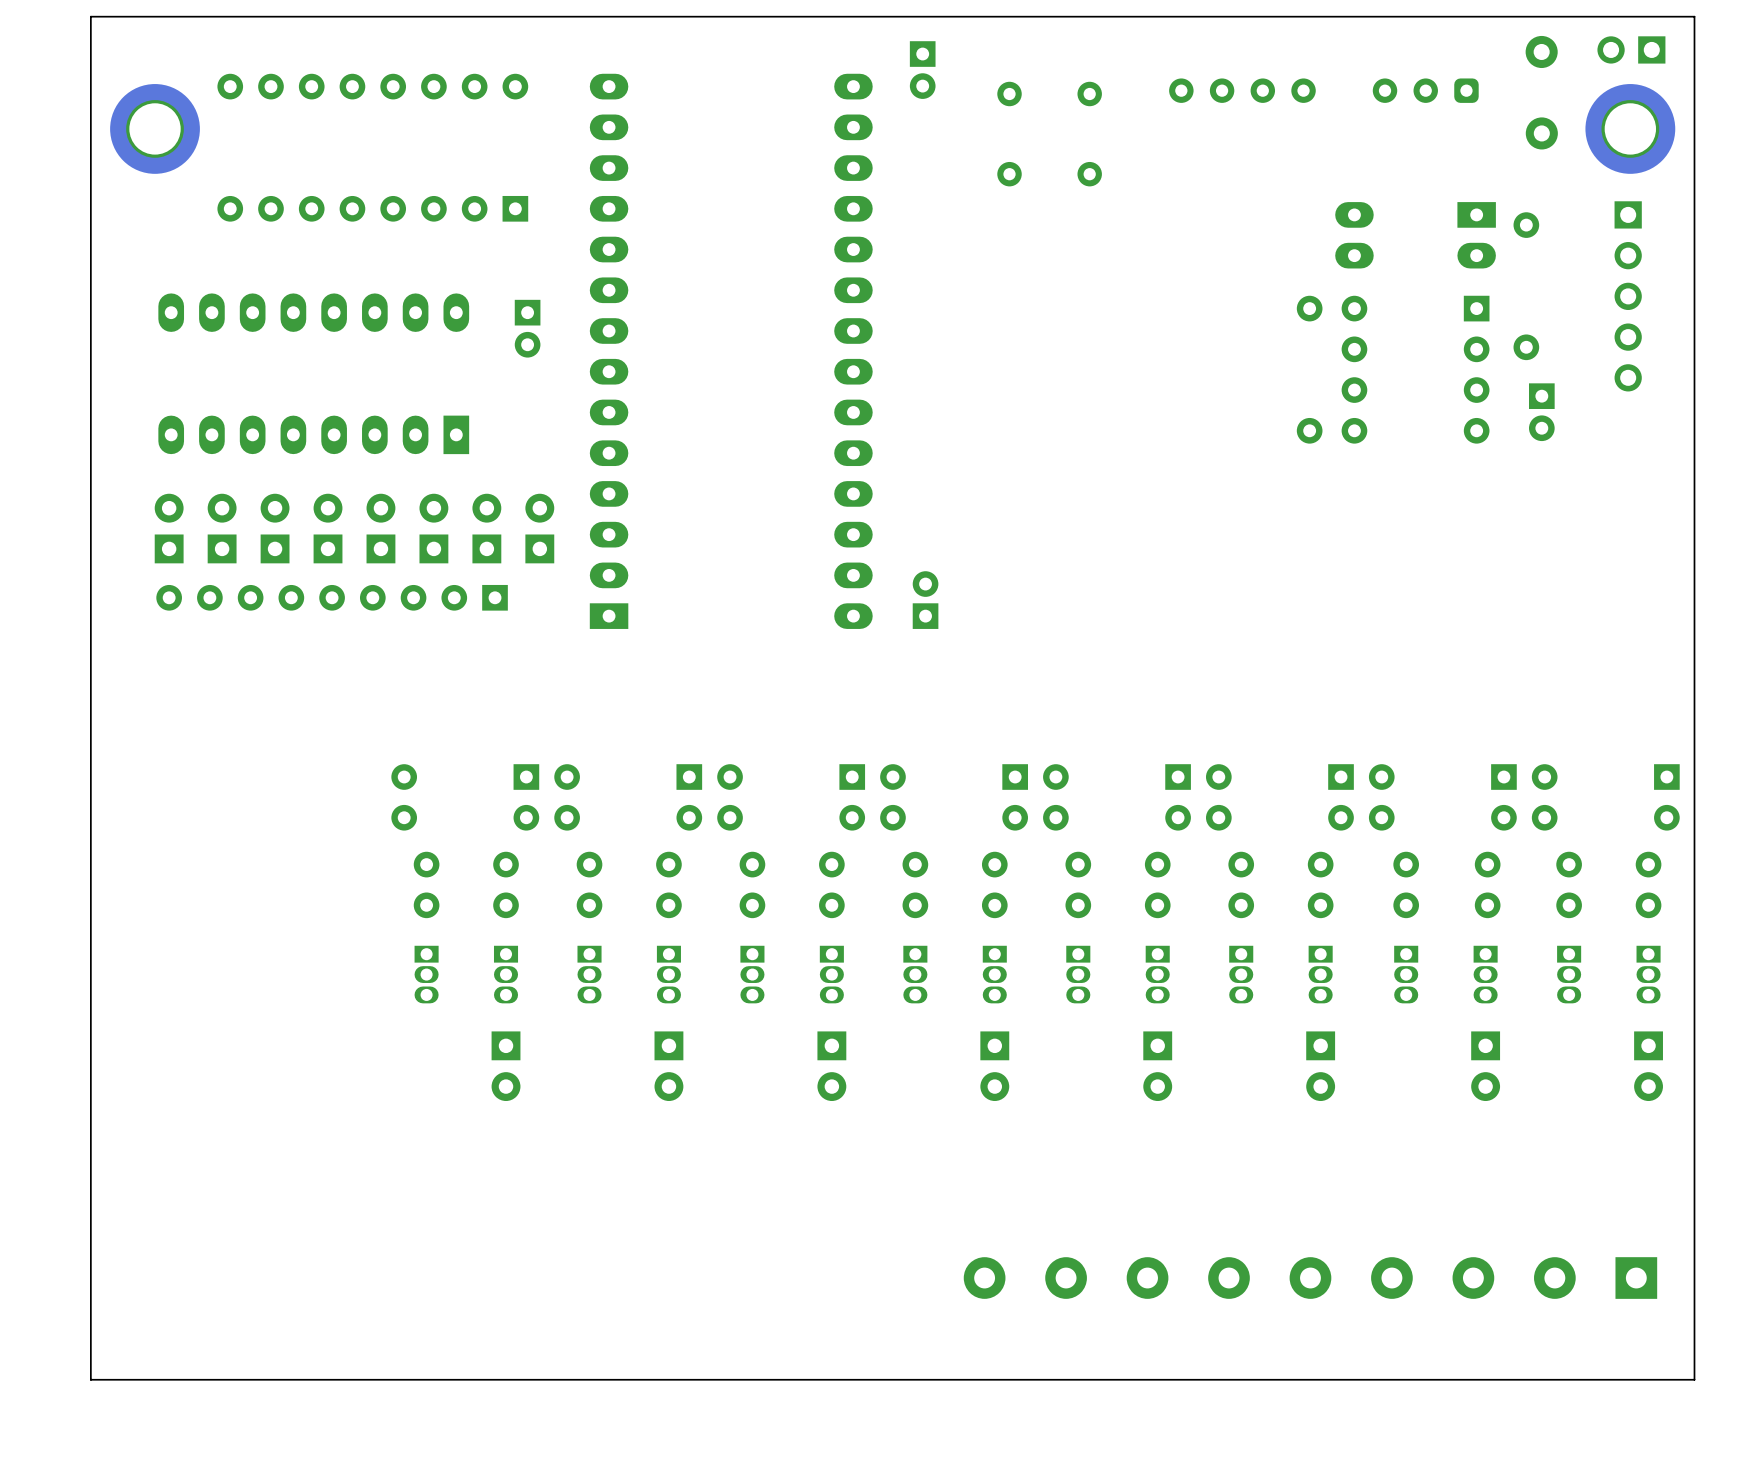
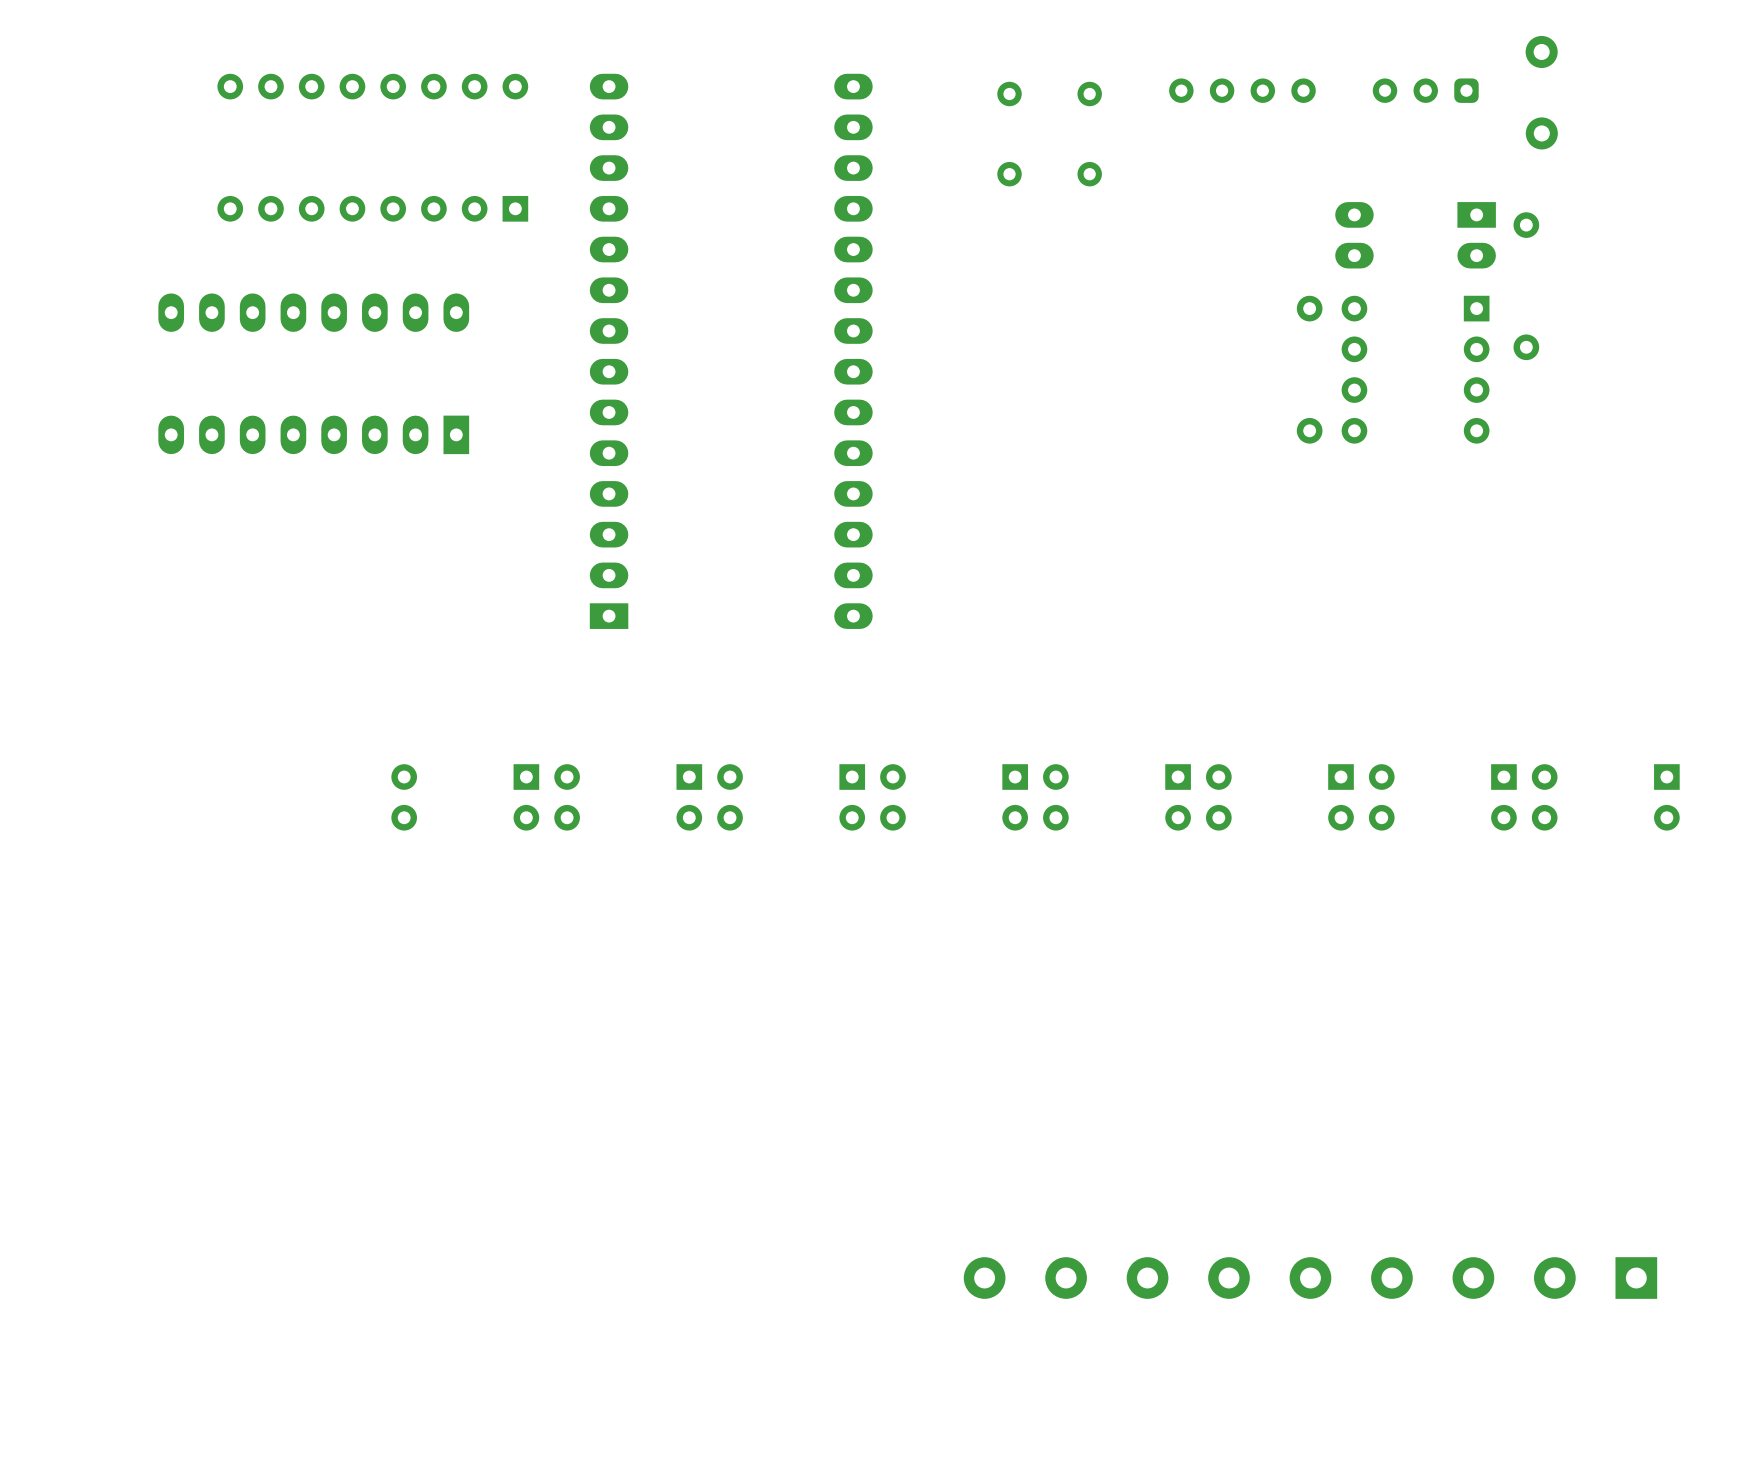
board edge: (1694, 16) (1694, 1379) (90, 1379) (90, 16) (1694, 16) -> none
part: (1631, 49) -> none
part: (922, 70) -> none
part: (155, 128) -> none
part: (1630, 128) -> none
part: (1628, 296) -> none
part: (527, 328) -> none
part: (1541, 412) -> none
part: (169, 528) -> none
part: (222, 528) -> none
part: (275, 528) -> none
part: (328, 528) -> none
part: (380, 528) -> none
part: (433, 528) -> none
part: (486, 528) -> none
part: (539, 528) -> none
part: (332, 597) -> none
part: (925, 600) -> none
part: (426, 884) -> none
part: (506, 884) -> none
part: (589, 884) -> none
part: (668, 884) -> none
part: (752, 884) -> none
part: (831, 884) -> none
part: (915, 884) -> none
part: (994, 884) -> none
part: (1078, 884) -> none
part: (1157, 884) -> none
part: (1241, 884) -> none
part: (1320, 884) -> none
part: (1406, 884) -> none
part: (1487, 884) -> none
part: (1569, 884) -> none
part: (1648, 884) -> none
part: (426, 974) -> none
part: (506, 974) -> none
part: (589, 974) -> none
part: (668, 974) -> none
part: (752, 974) -> none
part: (831, 974) -> none
part: (915, 974) -> none
part: (994, 974) -> none
part: (1078, 974) -> none
part: (1157, 974) -> none
part: (1241, 974) -> none
part: (1320, 974) -> none
part: (1406, 974) -> none
part: (1485, 974) -> none
part: (1569, 974) -> none
part: (1648, 974) -> none
part: (506, 1066) -> none
part: (668, 1066) -> none
part: (831, 1066) -> none
part: (994, 1066) -> none
part: (1157, 1066) -> none
part: (1320, 1066) -> none
part: (1485, 1066) -> none
part: (1648, 1066) -> none

